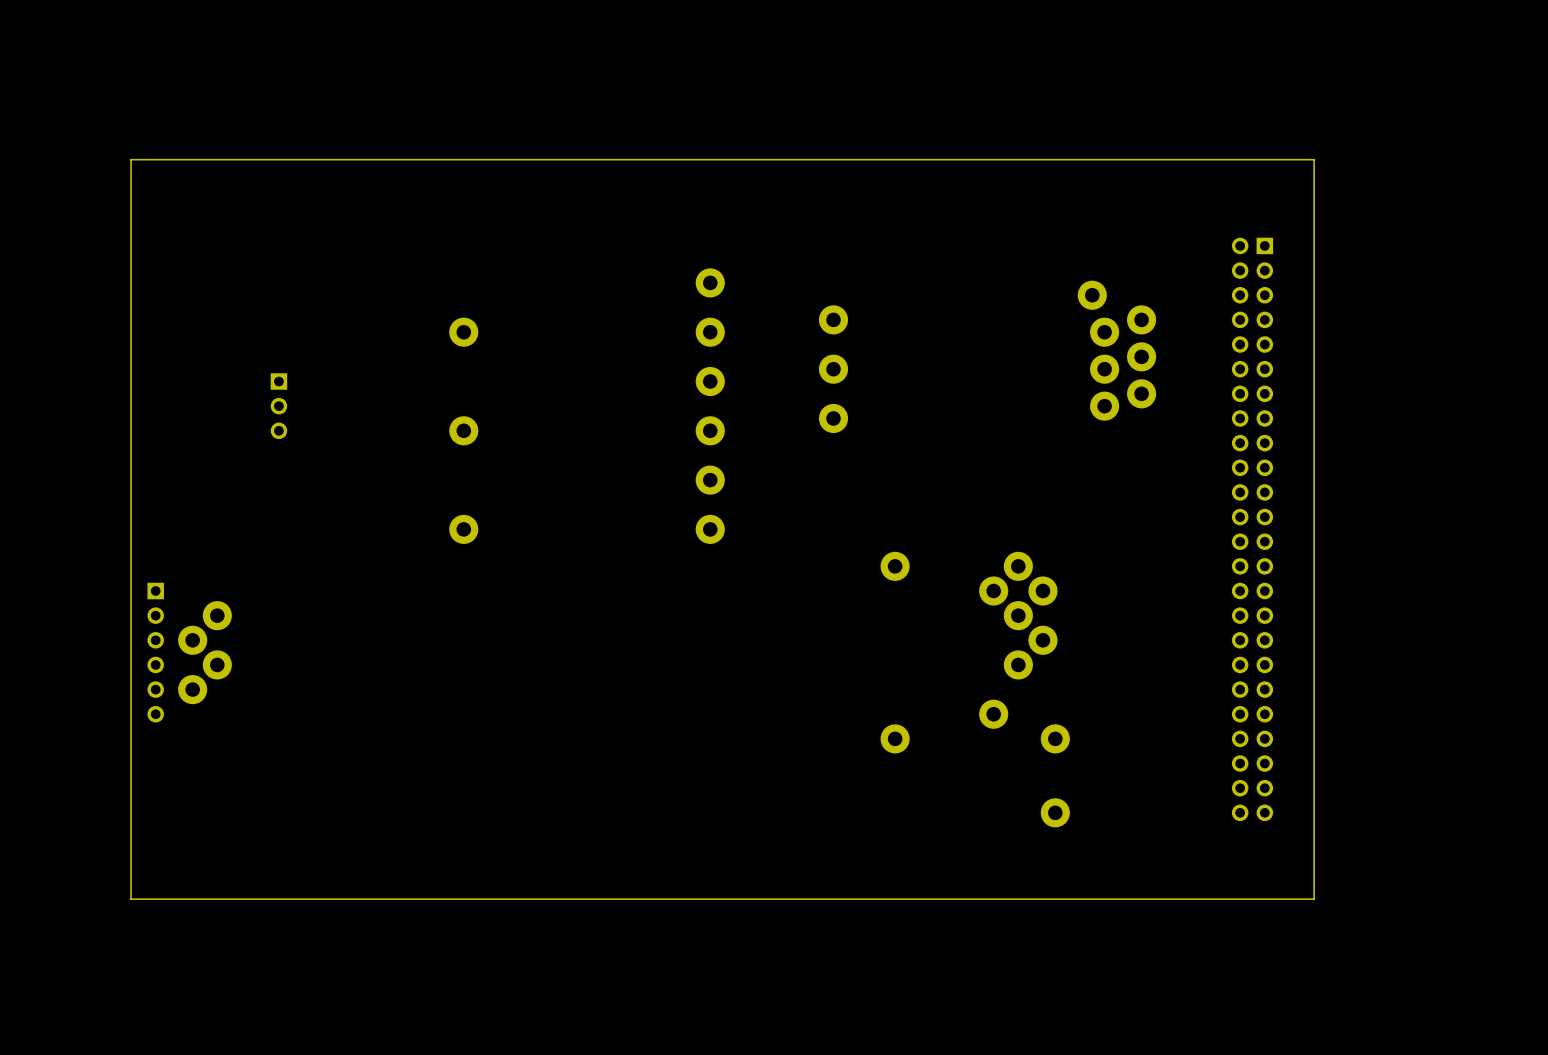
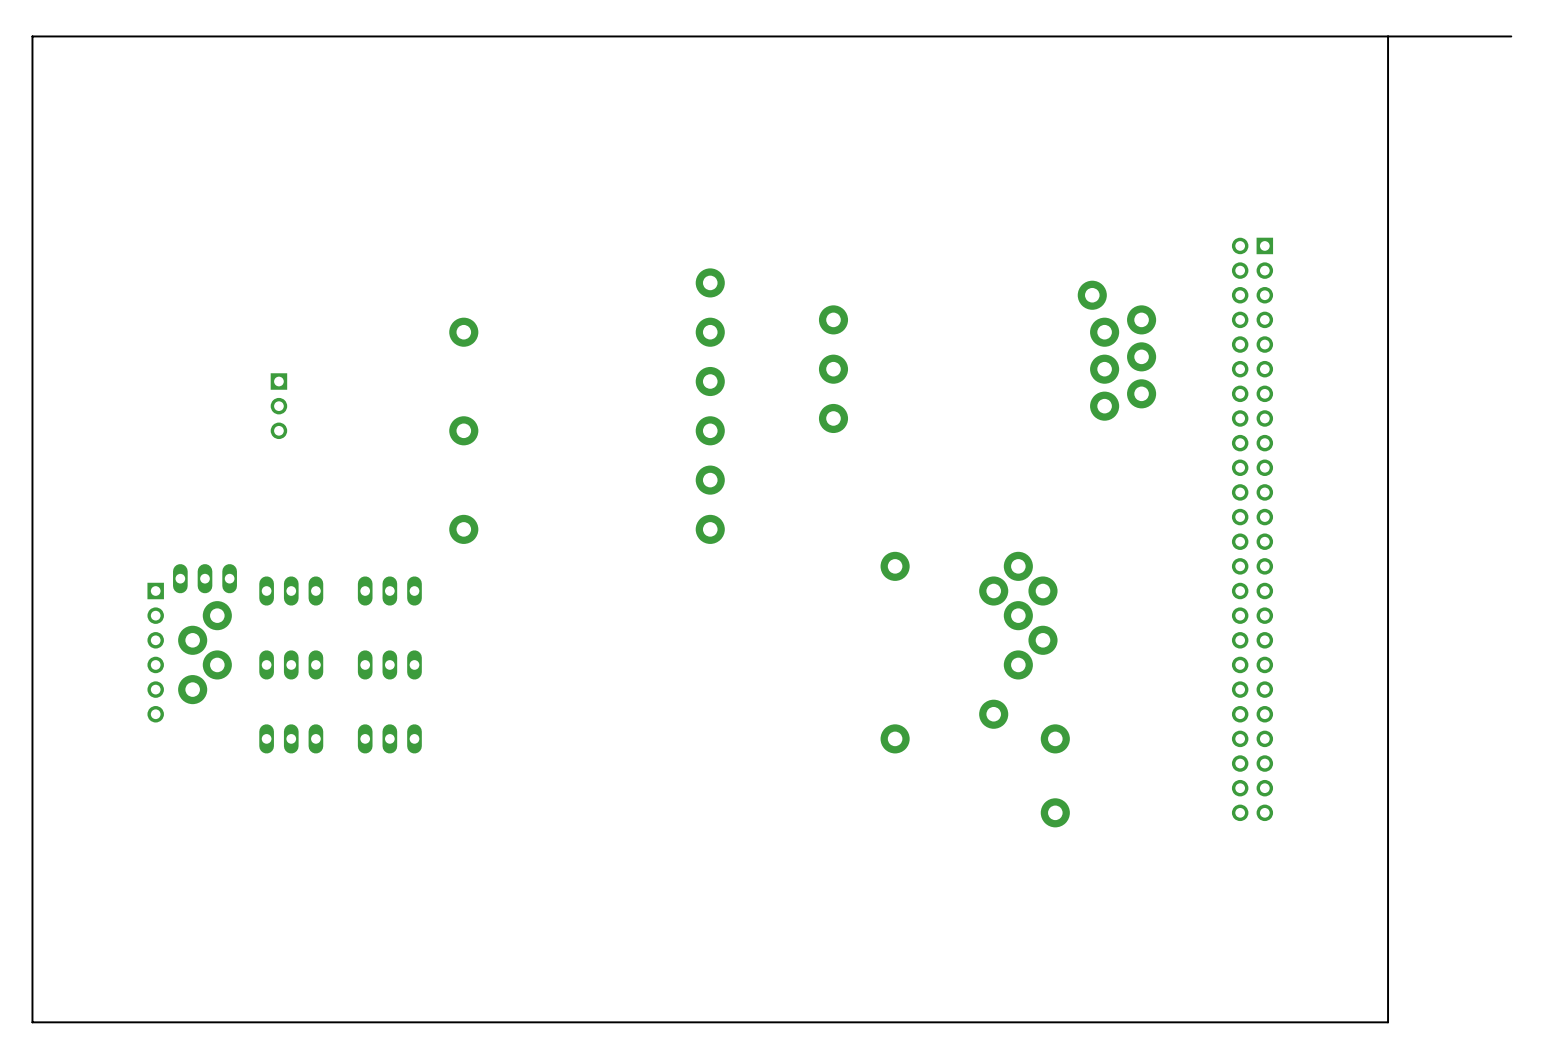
board edge: none -> (1511, 36) (32, 36) (32, 1022) (1388, 1022) (1388, 36)
board edge: (1314, 159) (1314, 899) (131, 899) (131, 159) (1314, 159) -> none
part: none -> (204, 578)
part: none -> (291, 591)
part: none -> (389, 591)
part: none -> (291, 664)
part: none -> (389, 664)
part: none -> (291, 738)
part: none -> (389, 738)

